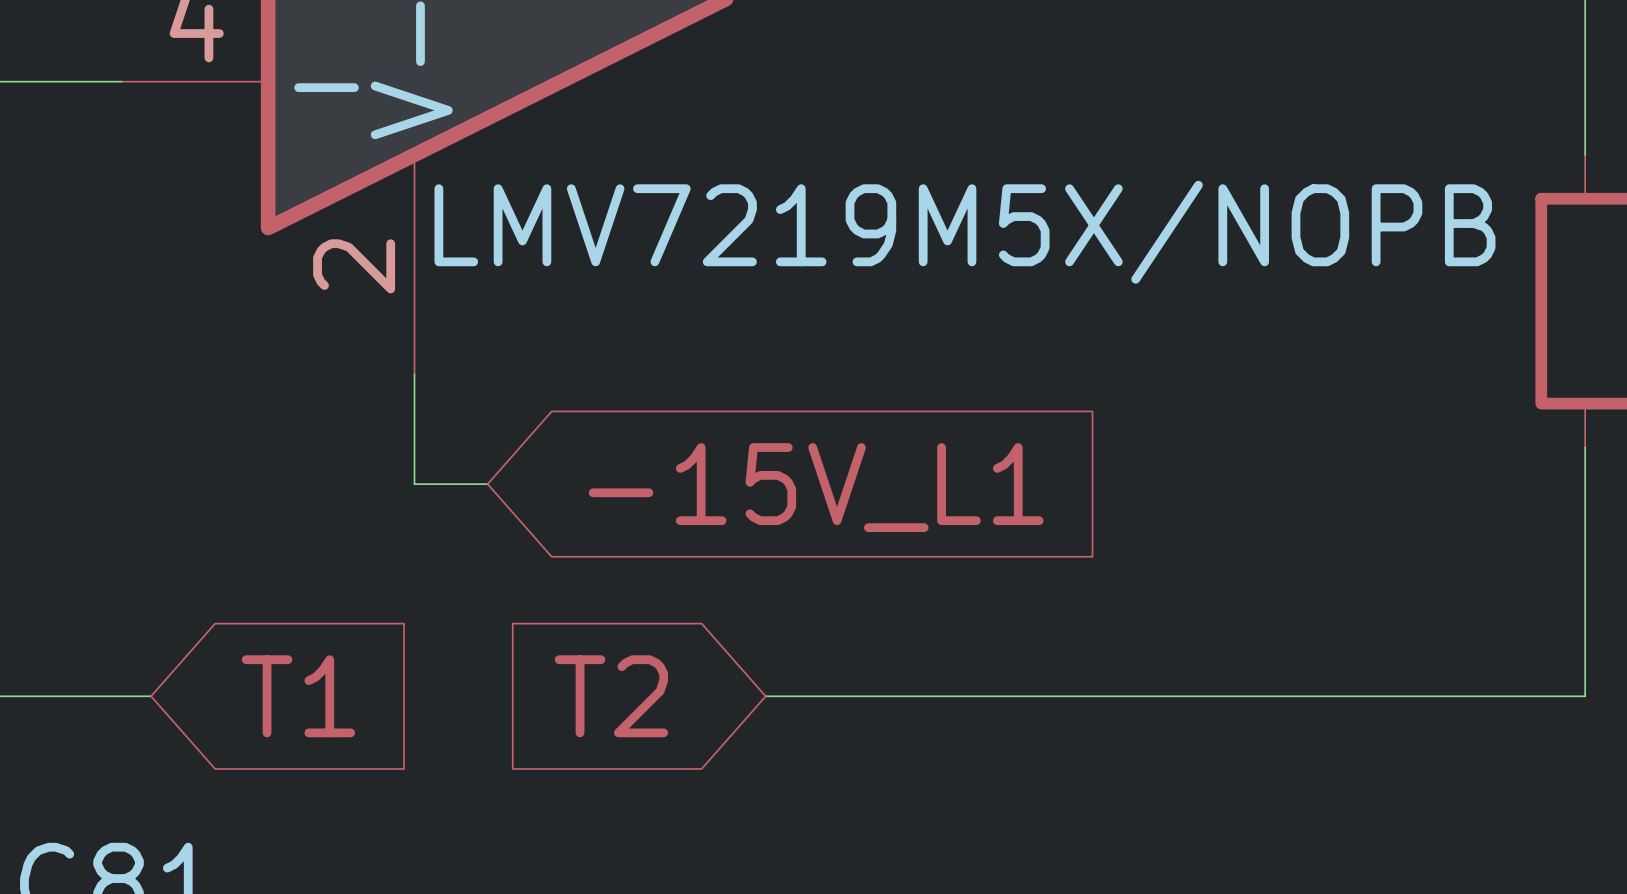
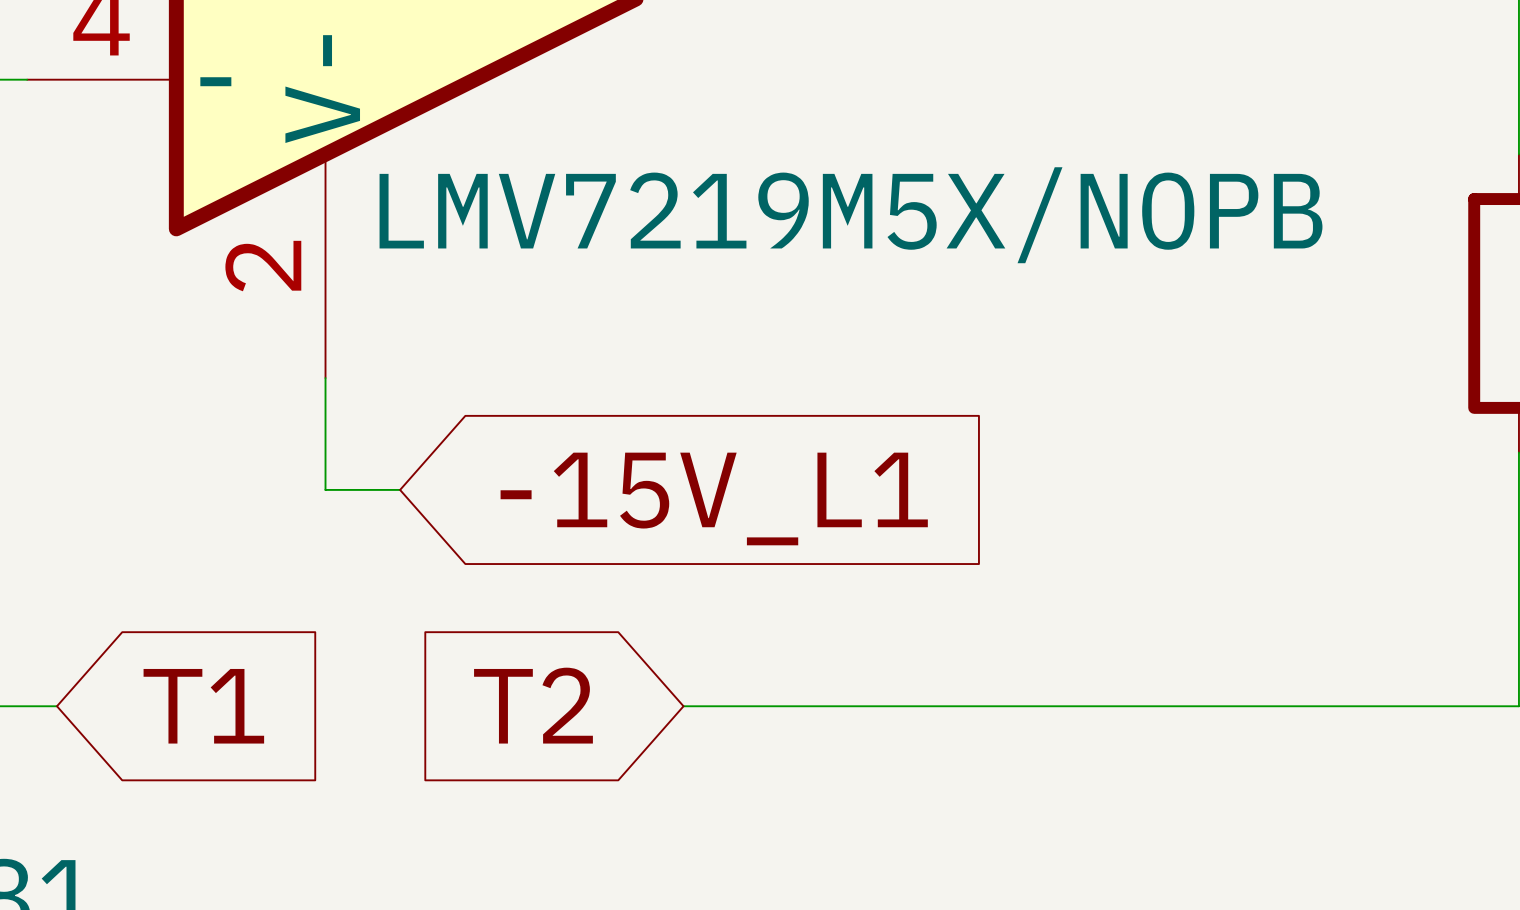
part value position: LMV7219M5X/NOPB (964, 232) -> LMV7219M5X/NOPB (851, 215)

